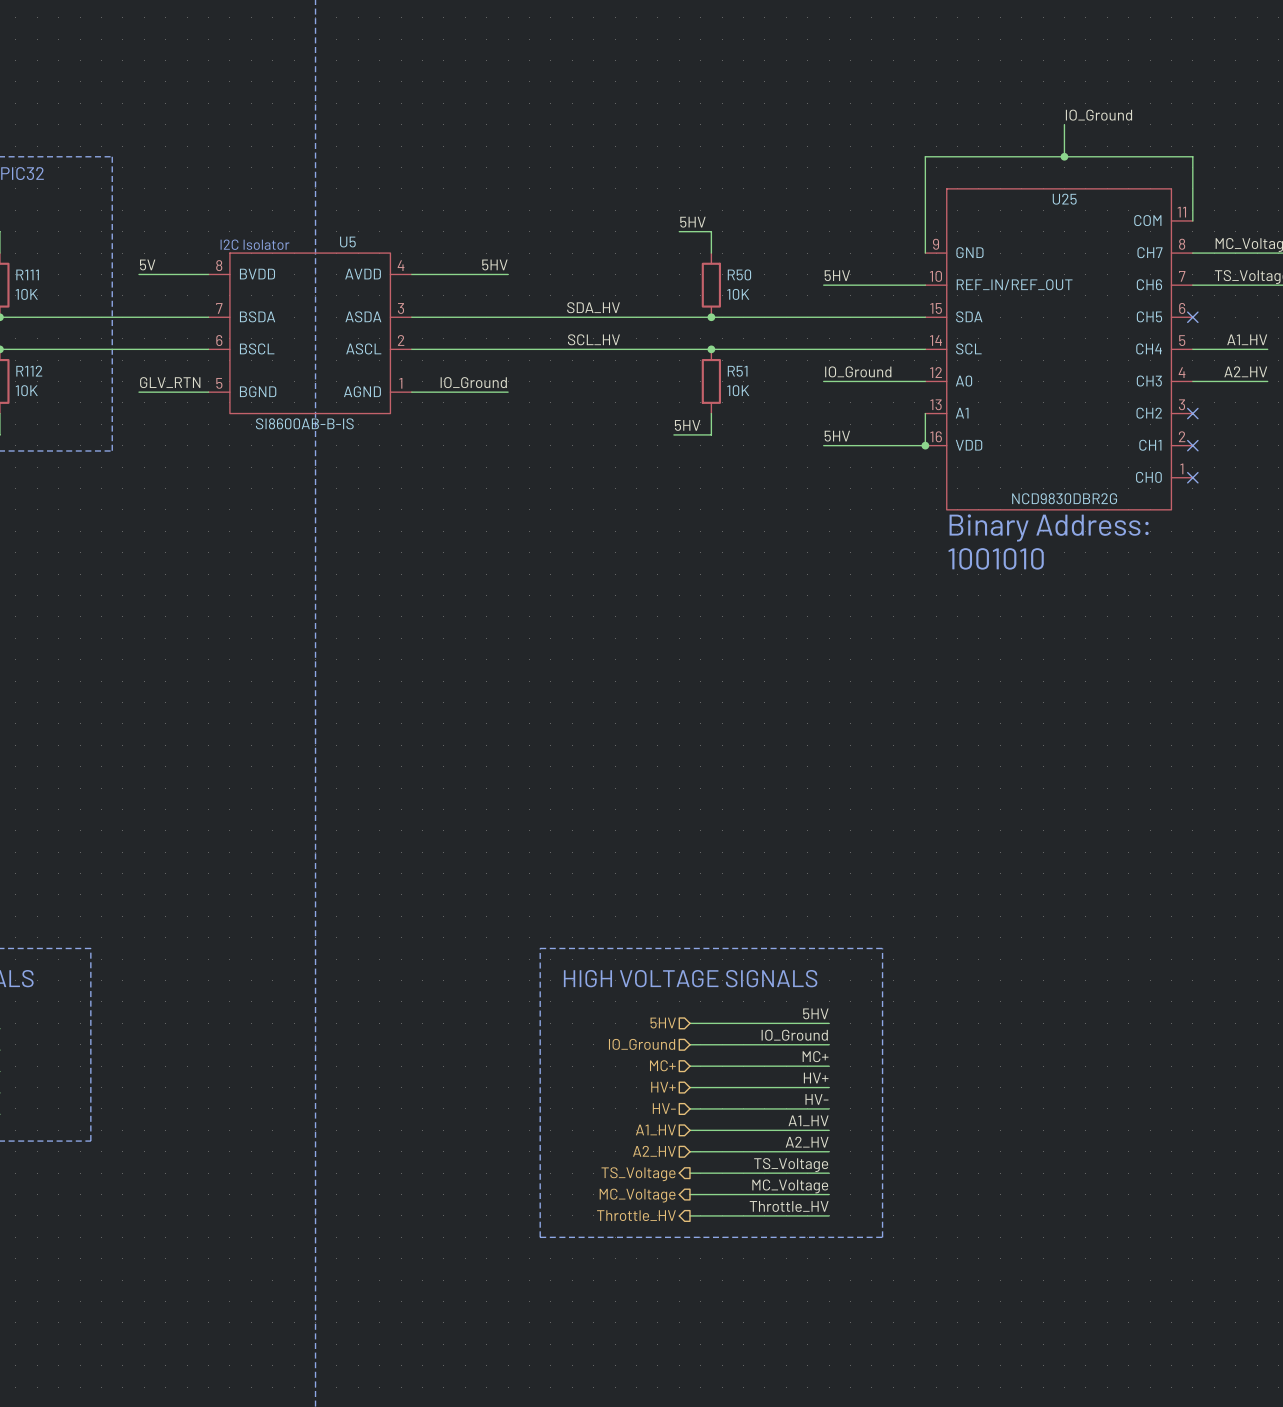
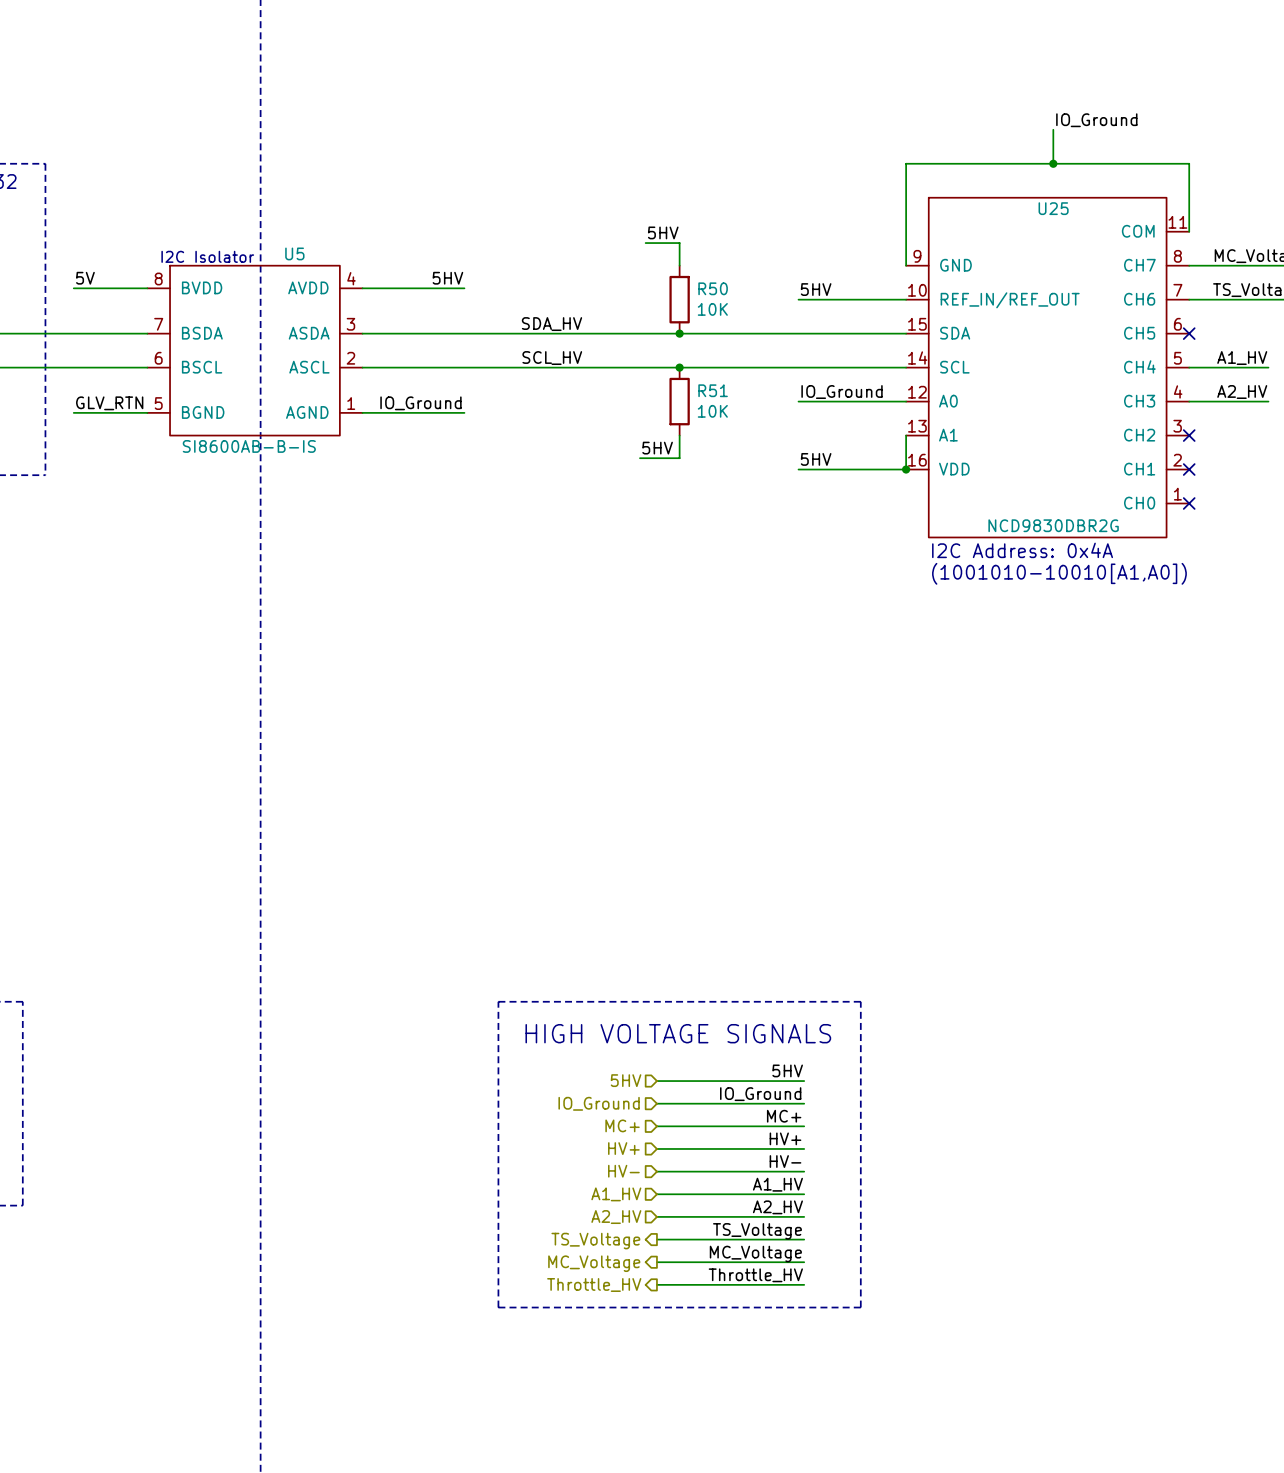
text: none -> I2C Address: 0x4A (1022, 550)
text: Binary Address: (1049, 527) -> none
text: none -> (1001010-10010[A1,A0]) (1059, 573)
text: 1001010 (996, 558) -> none

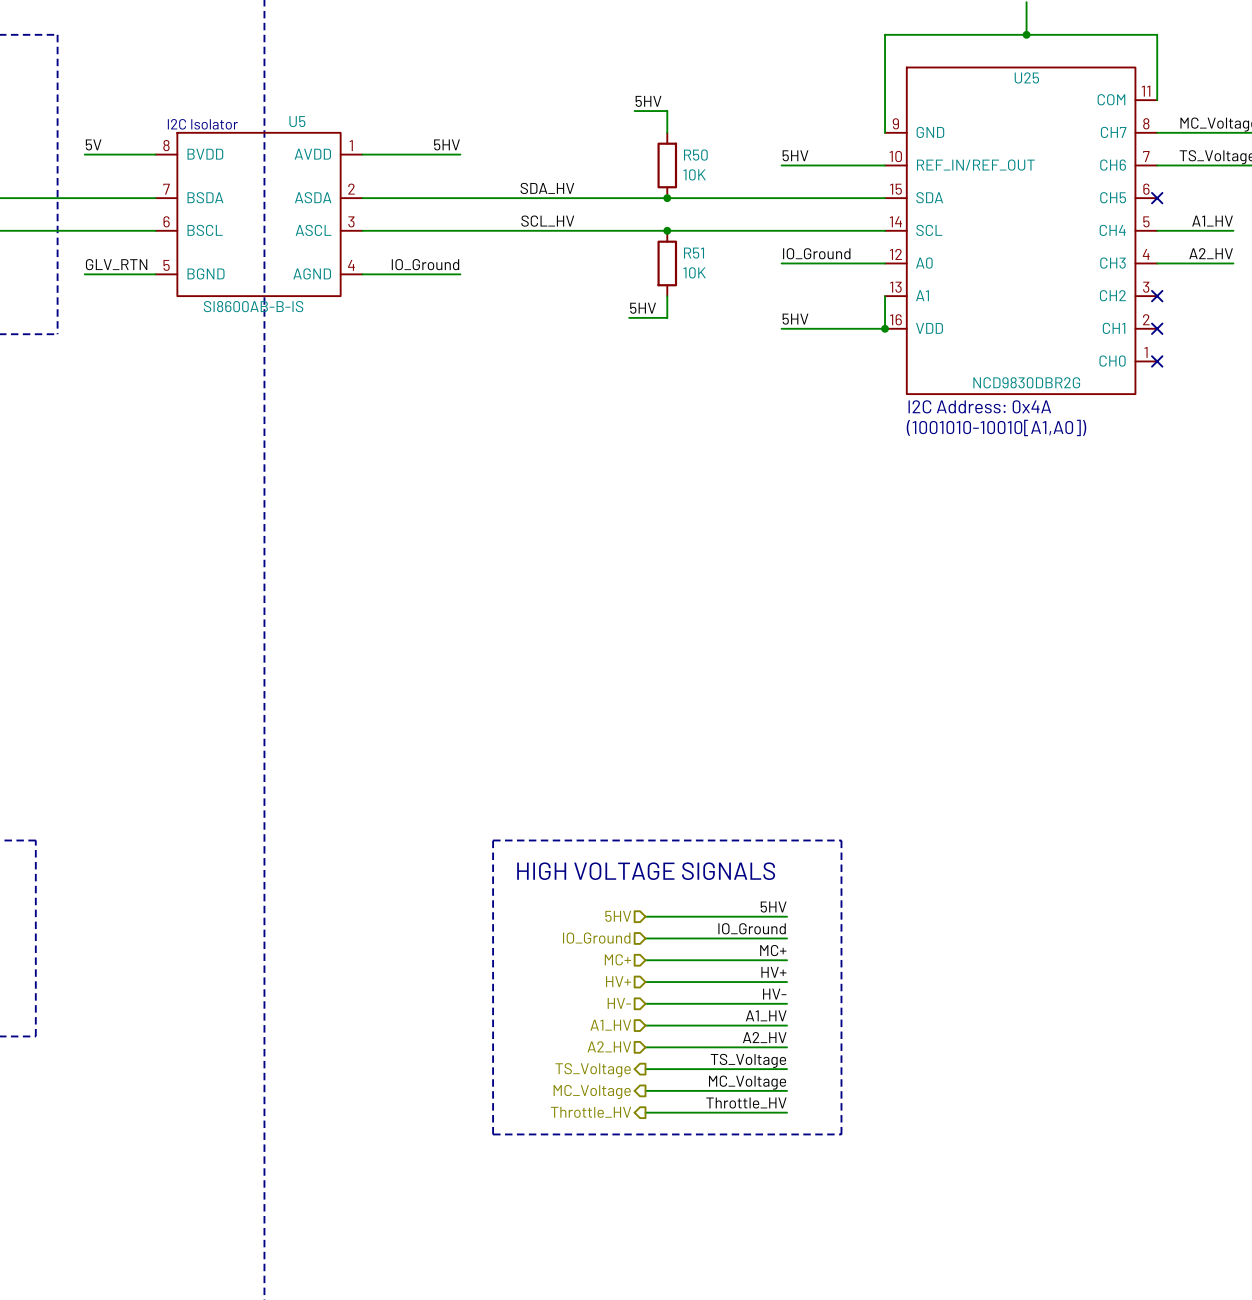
U5 pin number: 4 (351, 278) -> 1 (351, 145)
U5 pin number: 3 (350, 324) -> 2 (351, 189)
U5 pin number: 2 (350, 358) -> 3 (351, 221)
U5 pin number: 1 (351, 403) -> 4 (351, 265)

